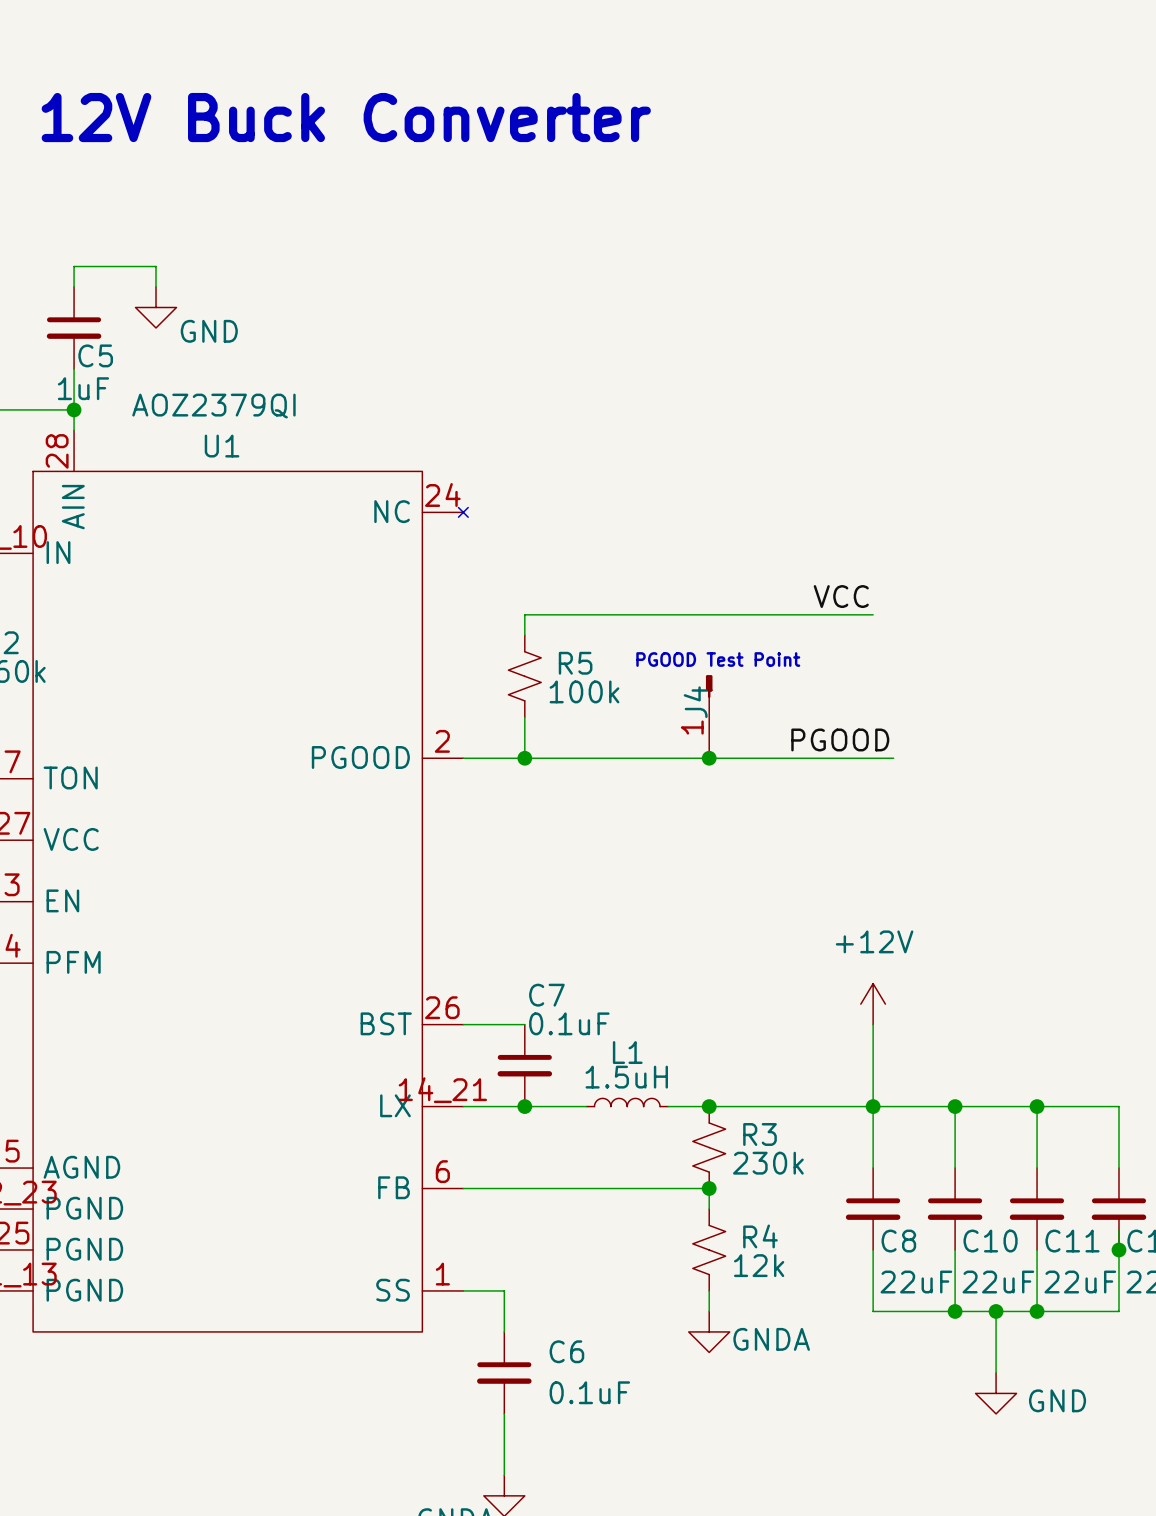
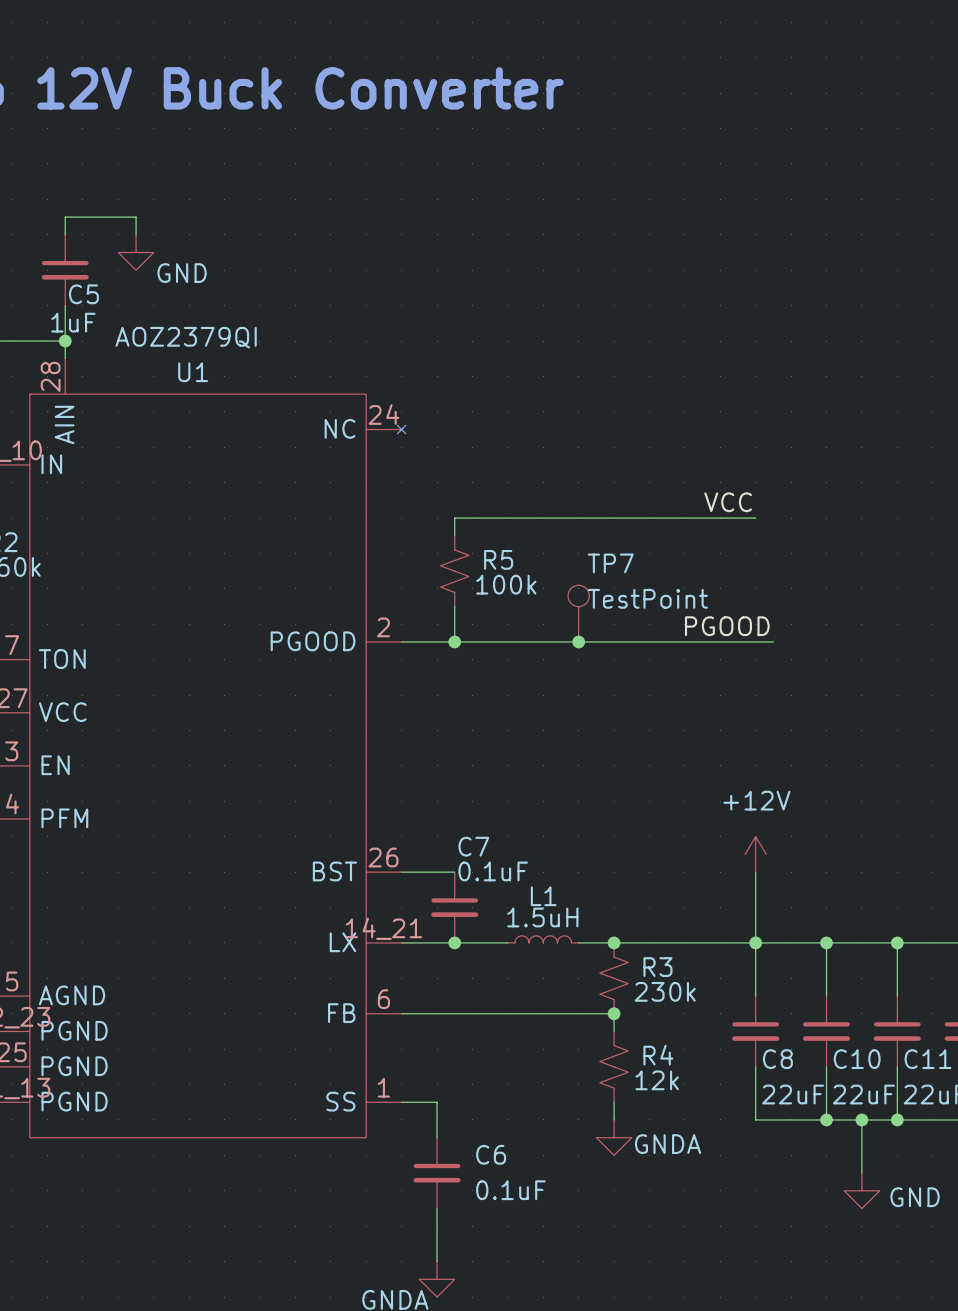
text: PGOOD Test Point (718, 659) -> none
J4: (709, 716) -> none
TP7: none -> TestPoint (578, 613)
junction position: (709, 758) -> (578, 641)

